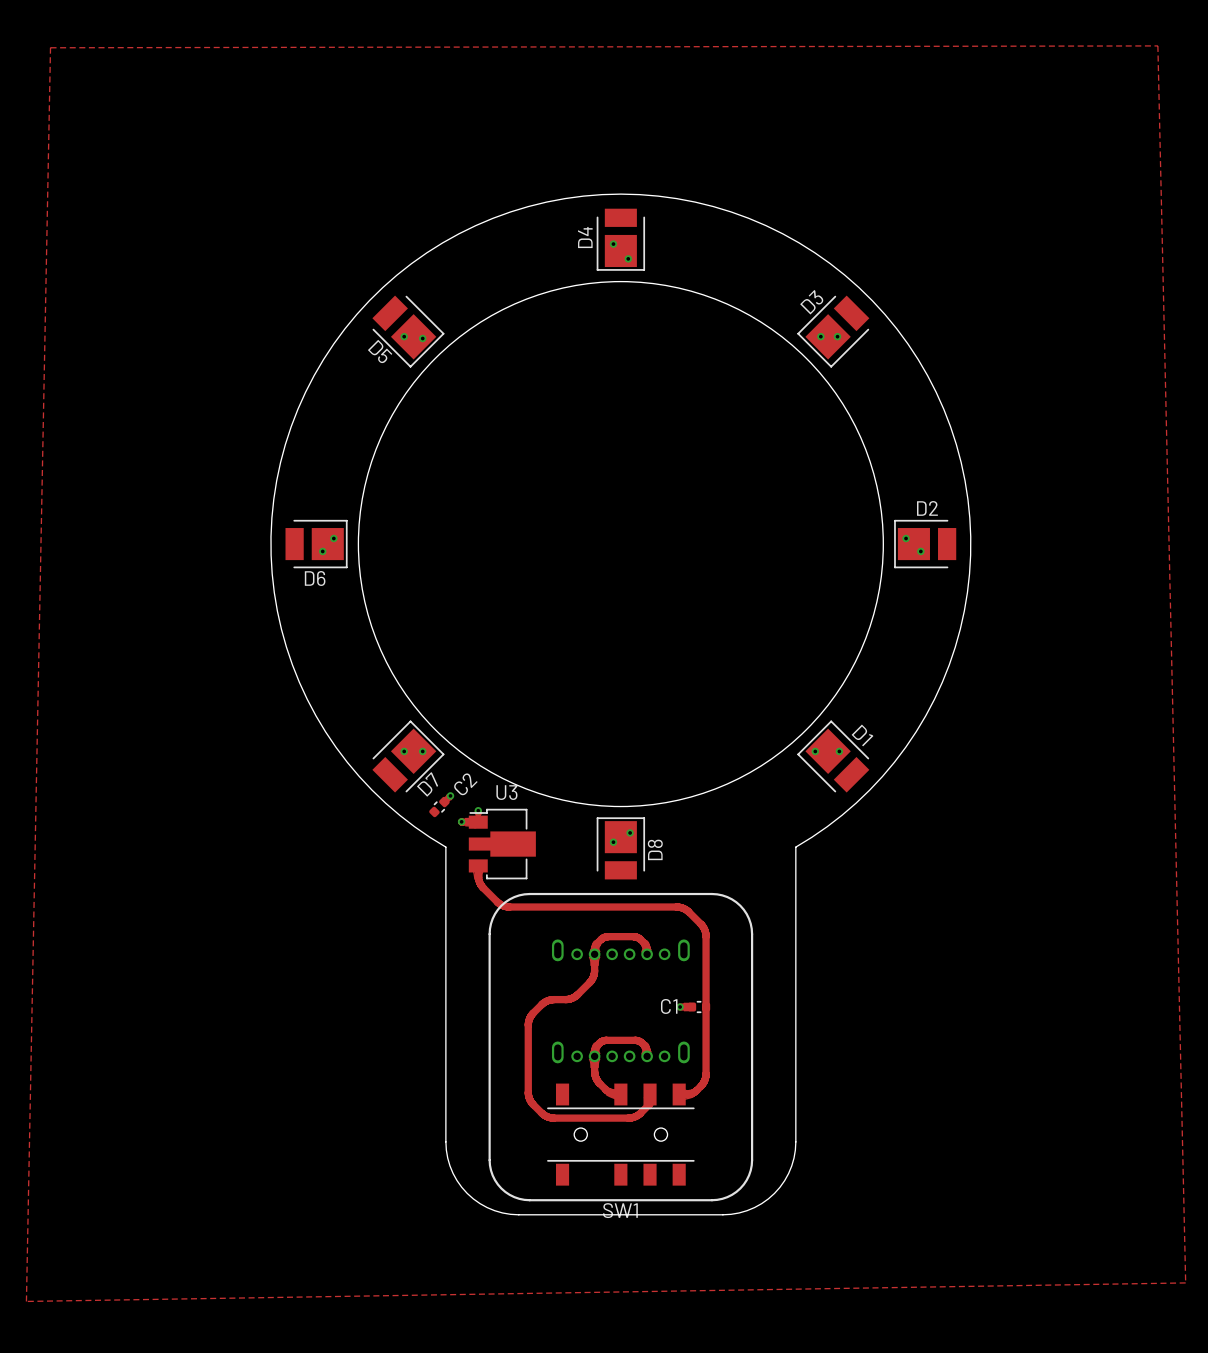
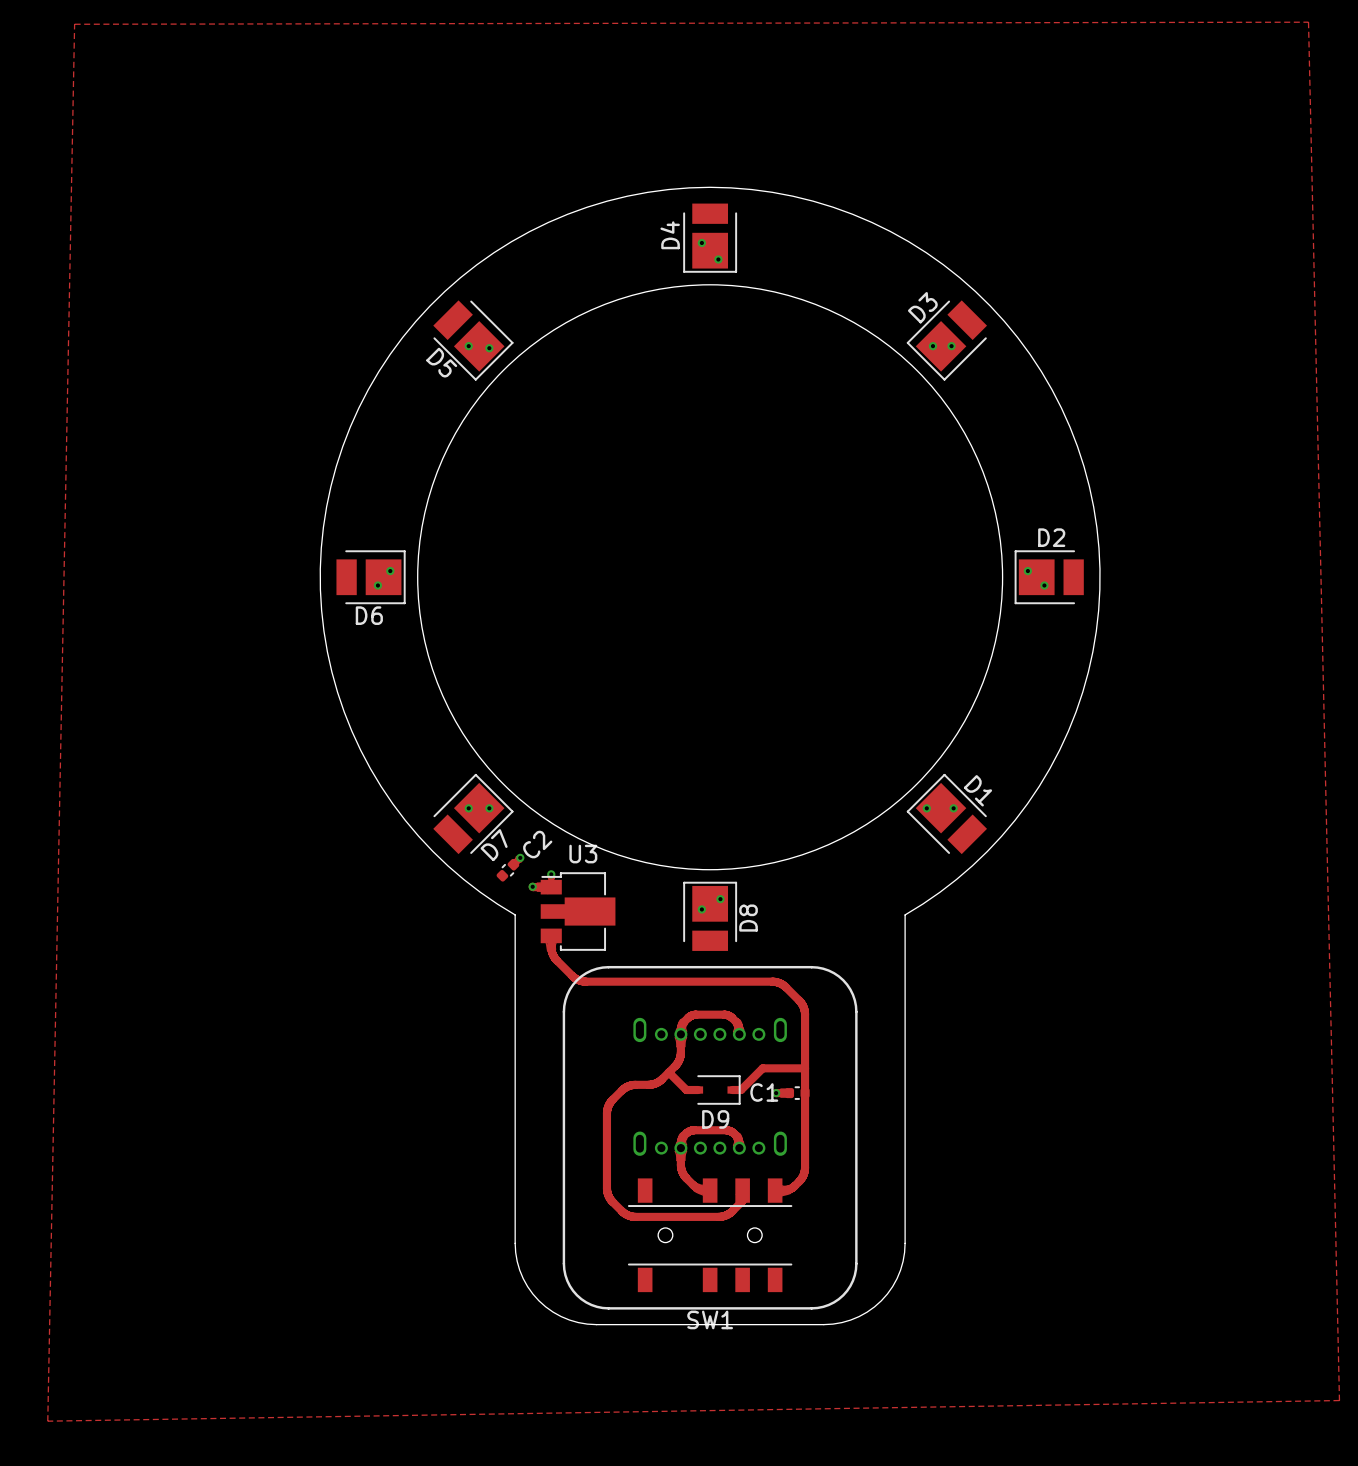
track: none -> (805, 1068) (762, 1068) (741, 1090) (732, 1090)
track: none -> (668, 1072) (686, 1090) (698, 1090)
D9: none -> (717, 1090)

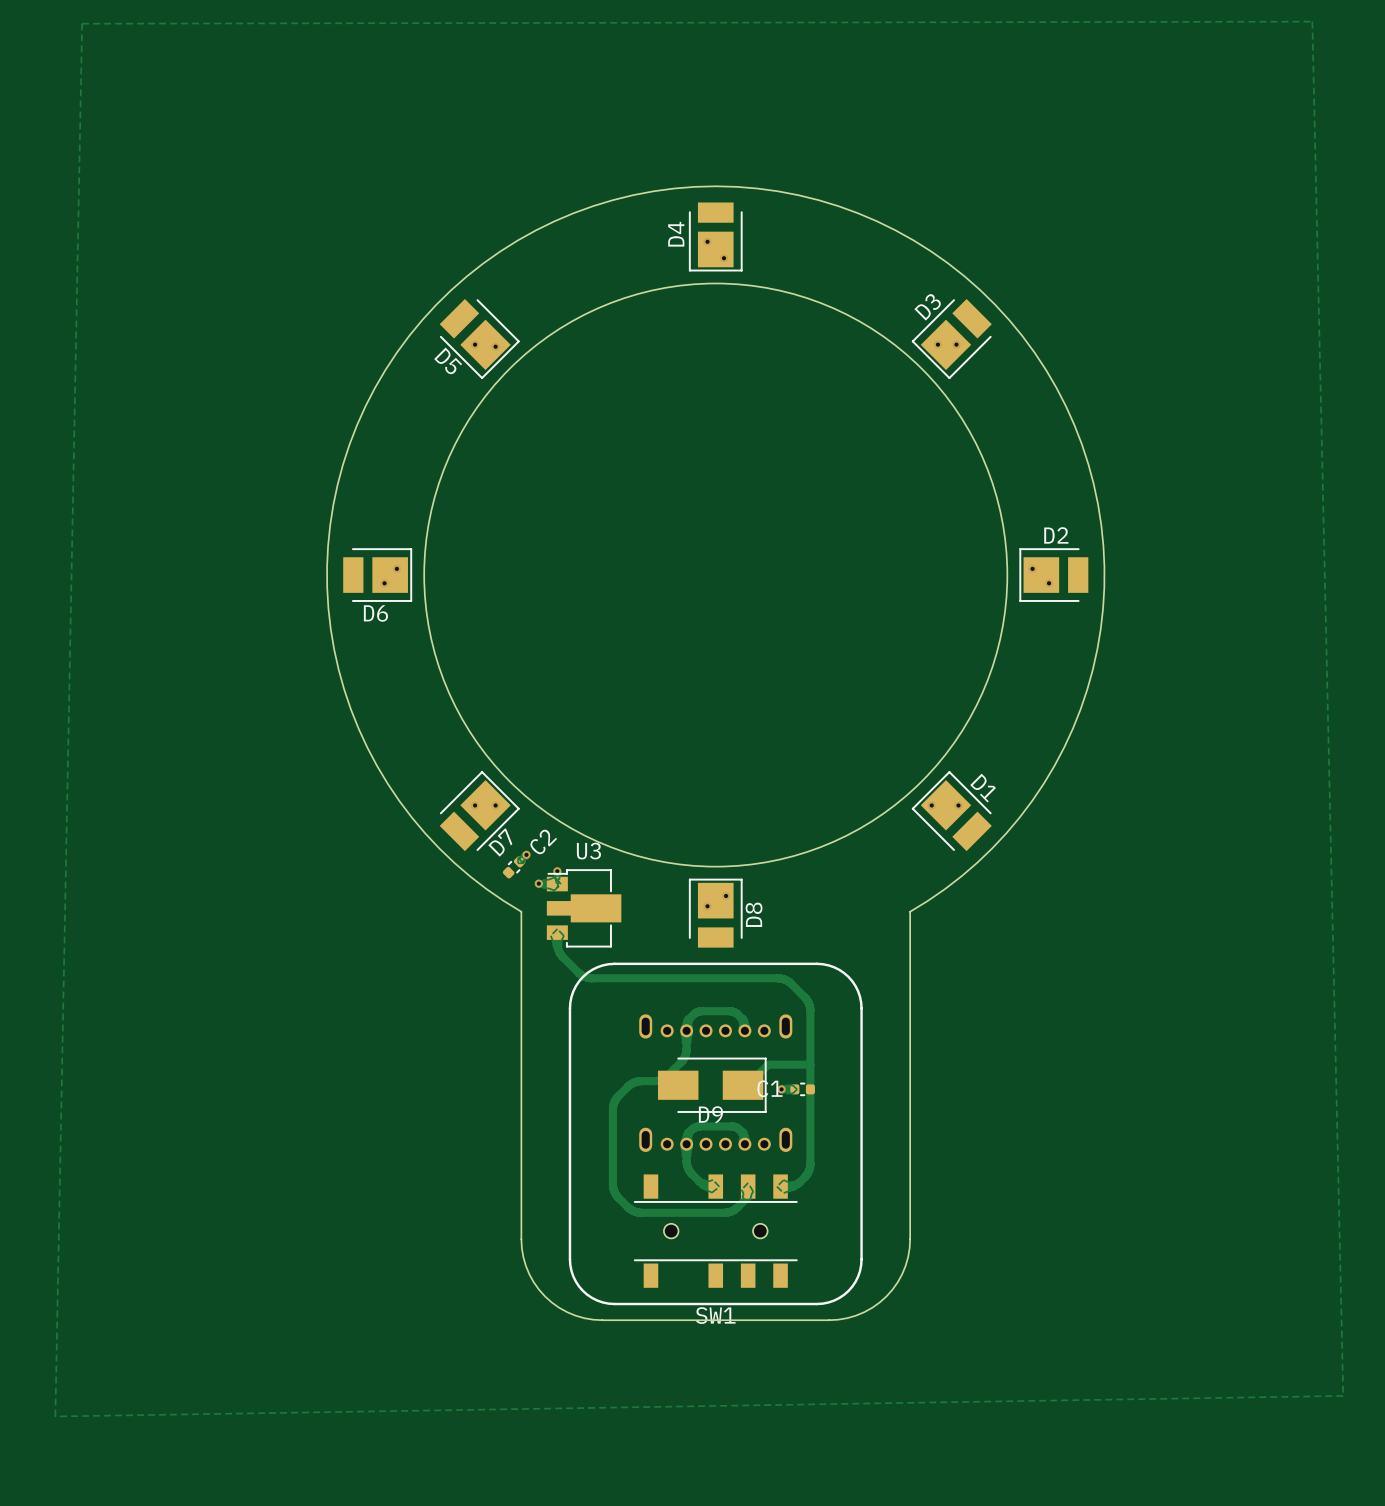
track: (668, 1072) (686, 1090) (698, 1090) -> none
D9 footprint: [693, 1075, 741, 1105] -> [657, 1057, 767, 1113]

